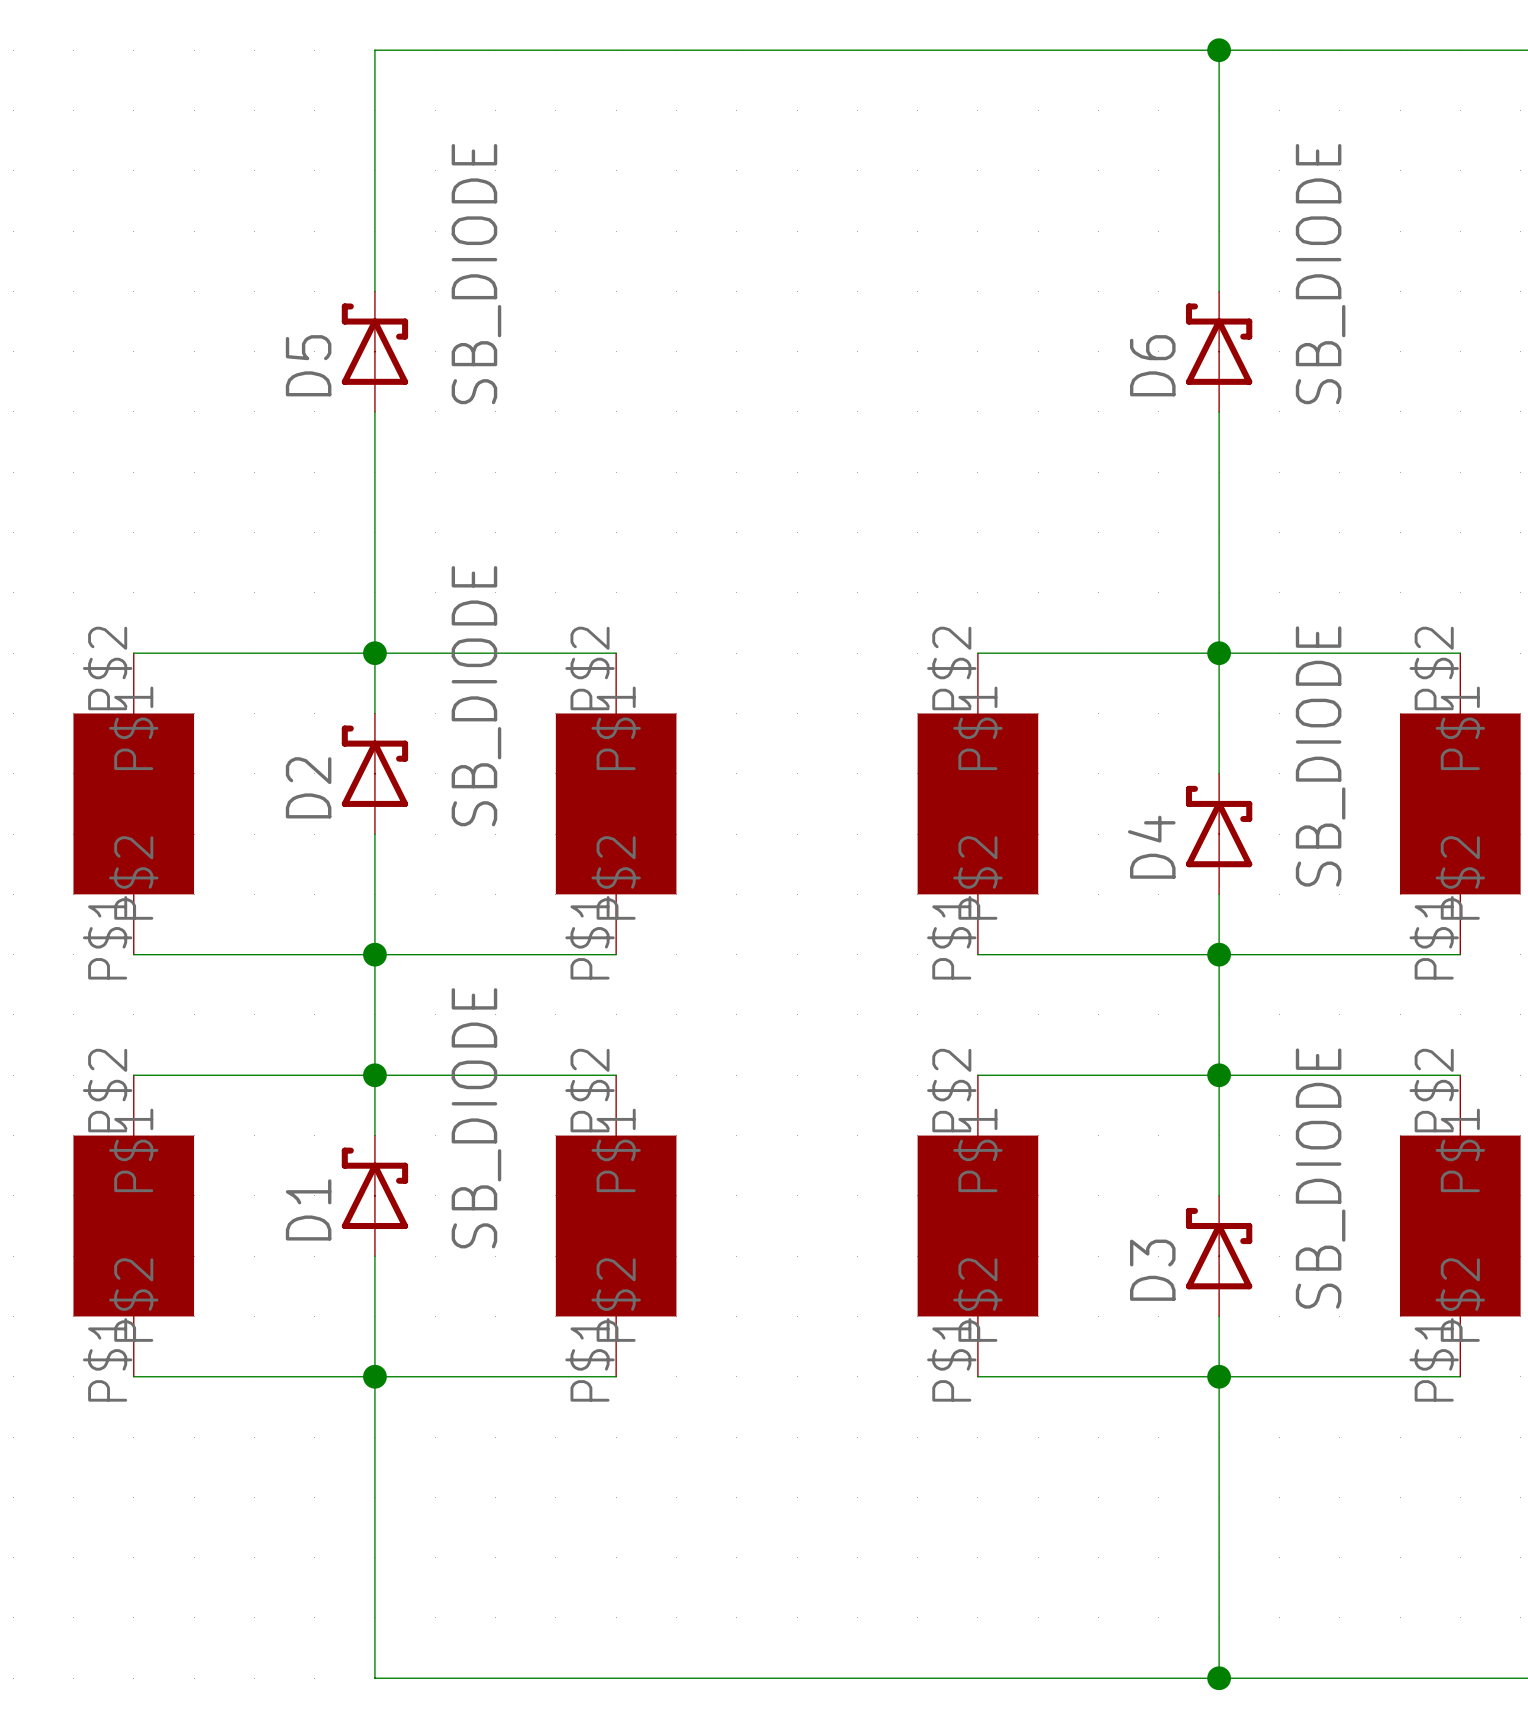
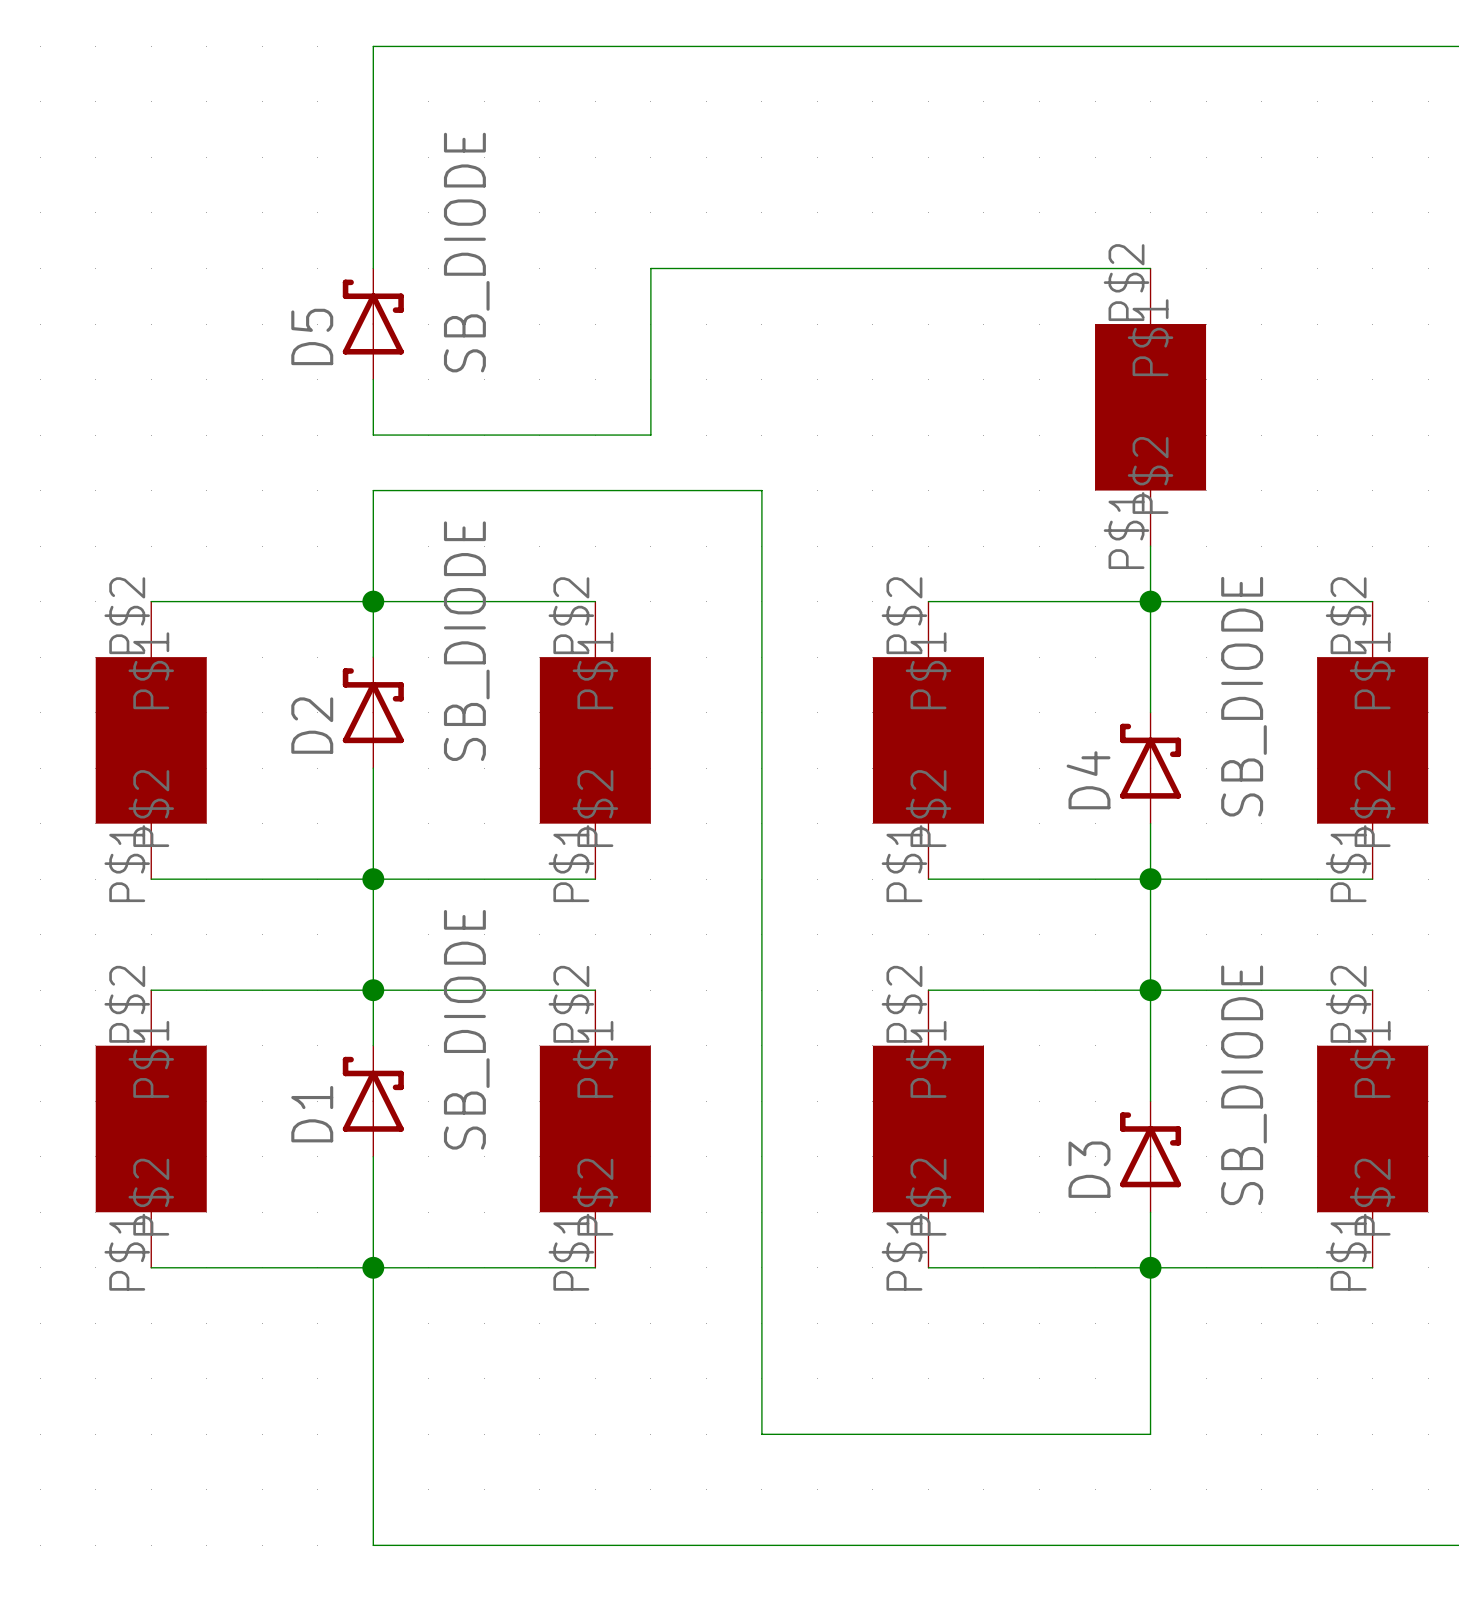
wire: (1219, 50) (1219, 291) -> none
junction: (1219, 50) -> none
D6: SB_DIODE (1219, 351) -> none
part: none -> (1150, 407)
wire: (374, 472) (374, 532) -> (373, 435) (650, 435) (650, 268) (1150, 268)
wire: (1219, 1557) (1219, 1678) -> (1150, 1434) (761, 1434) (761, 490) (373, 490)
junction: (1219, 1678) -> none

